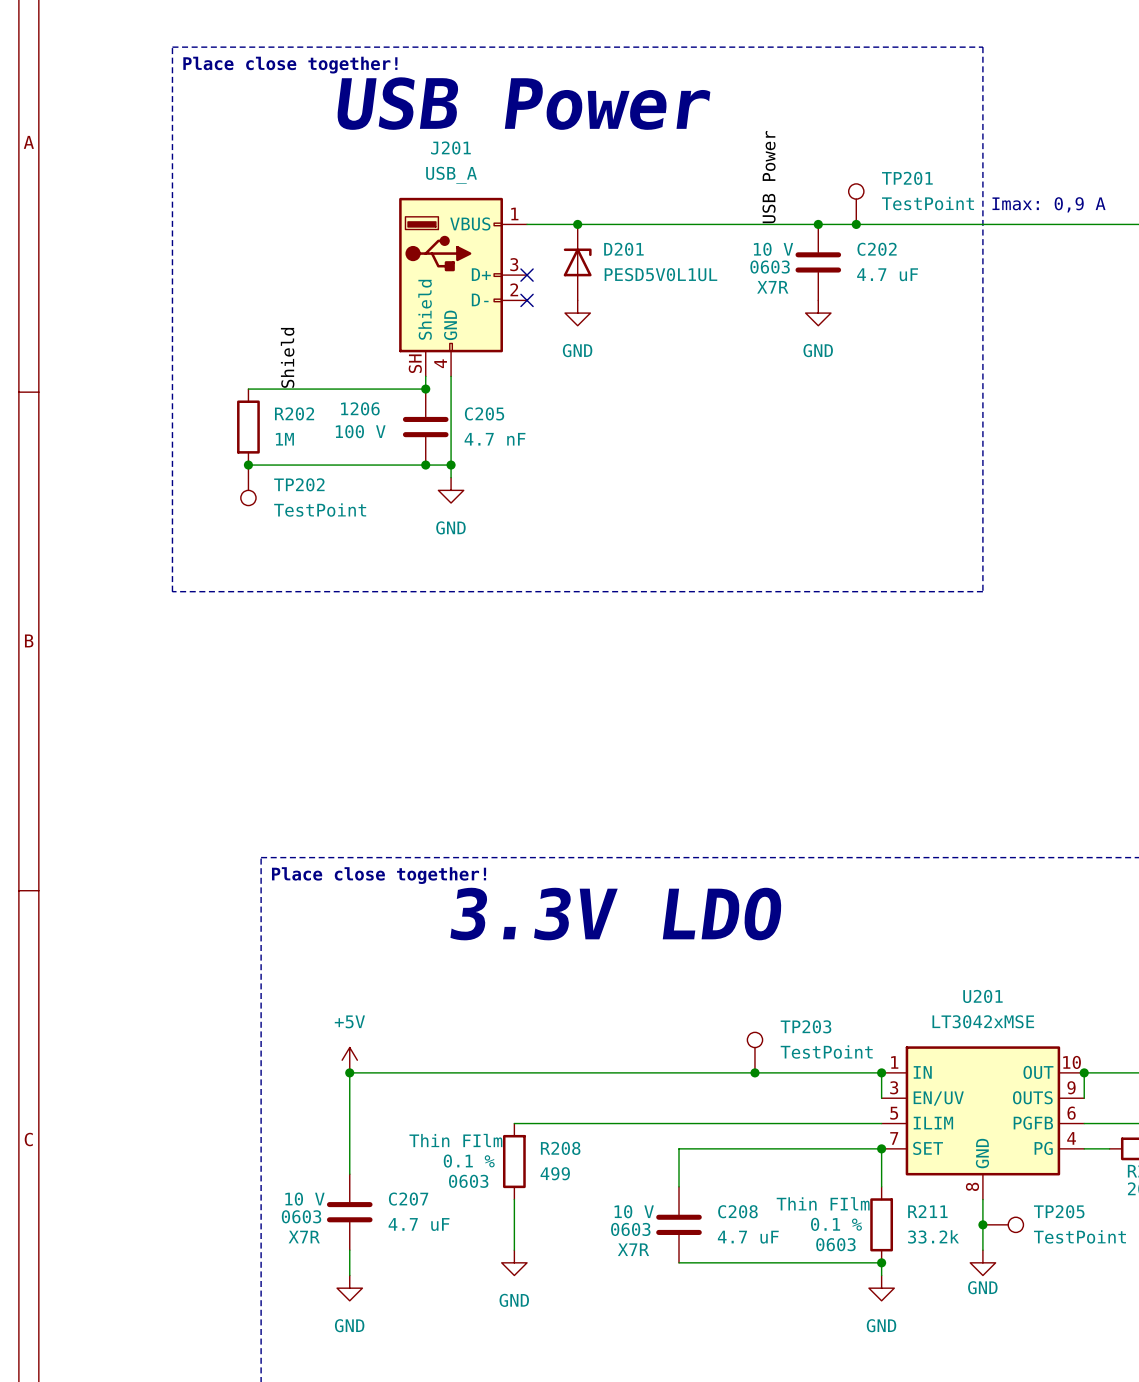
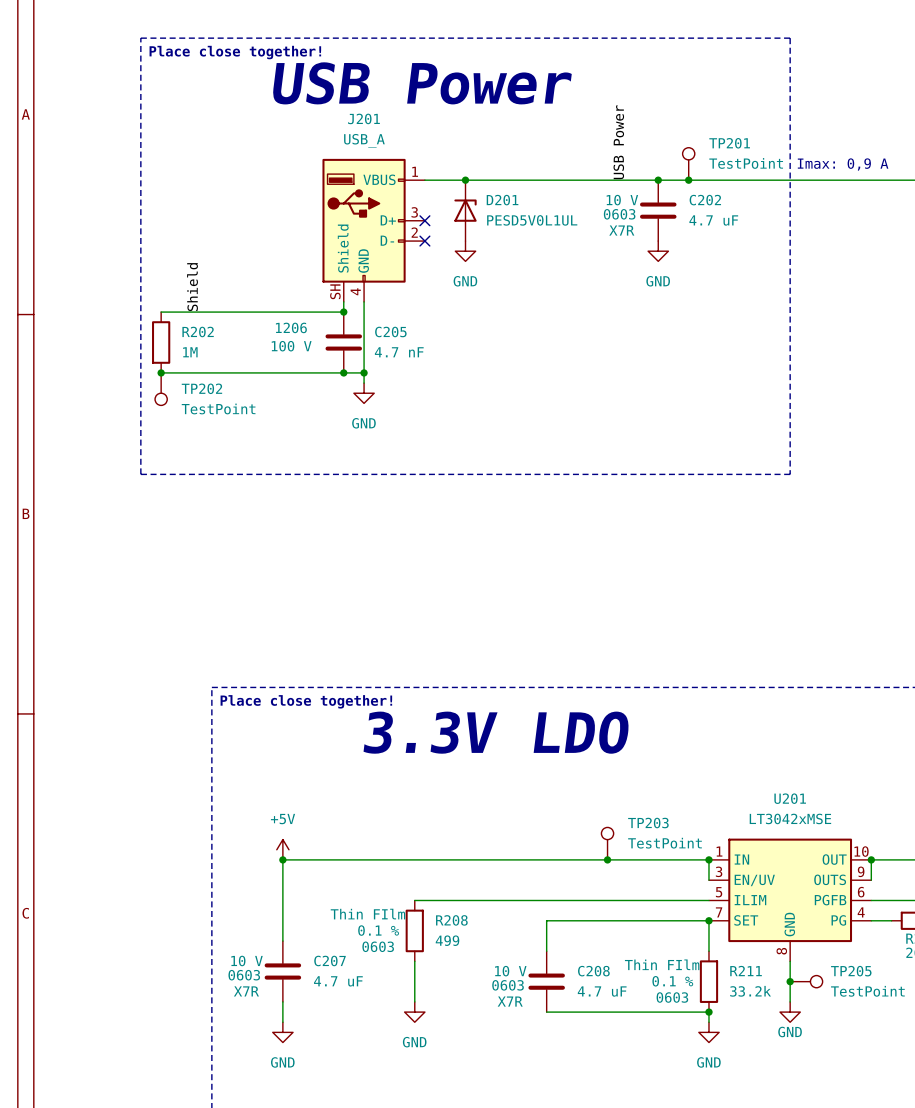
label position: Shield (287, 357) -> Shield (192, 287)
wire: none -> (161, 312) (201, 312)
R202 position: (248, 427) -> (161, 342)
wire: none -> (161, 372) (201, 372)
junction position: (248, 465) -> (161, 372)
TP202 position: (248, 485) -> (161, 389)

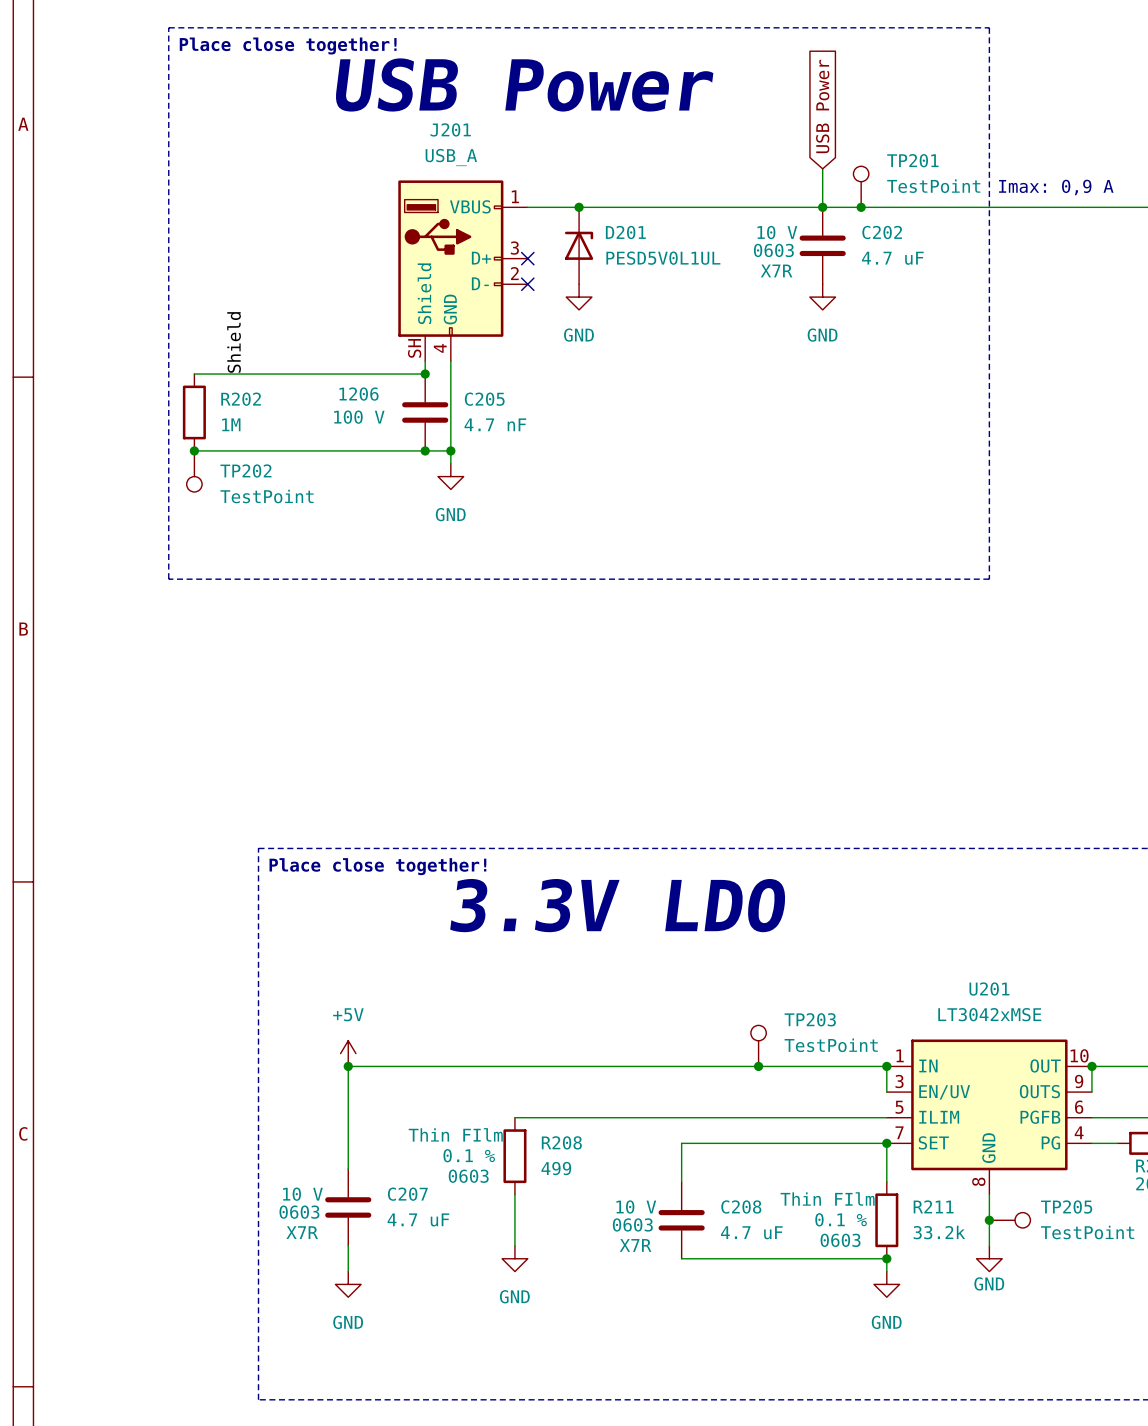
global label: none -> USB Power (822, 106)
label: USB Power (618, 142) -> none
wire: none -> (822, 168) (822, 207)

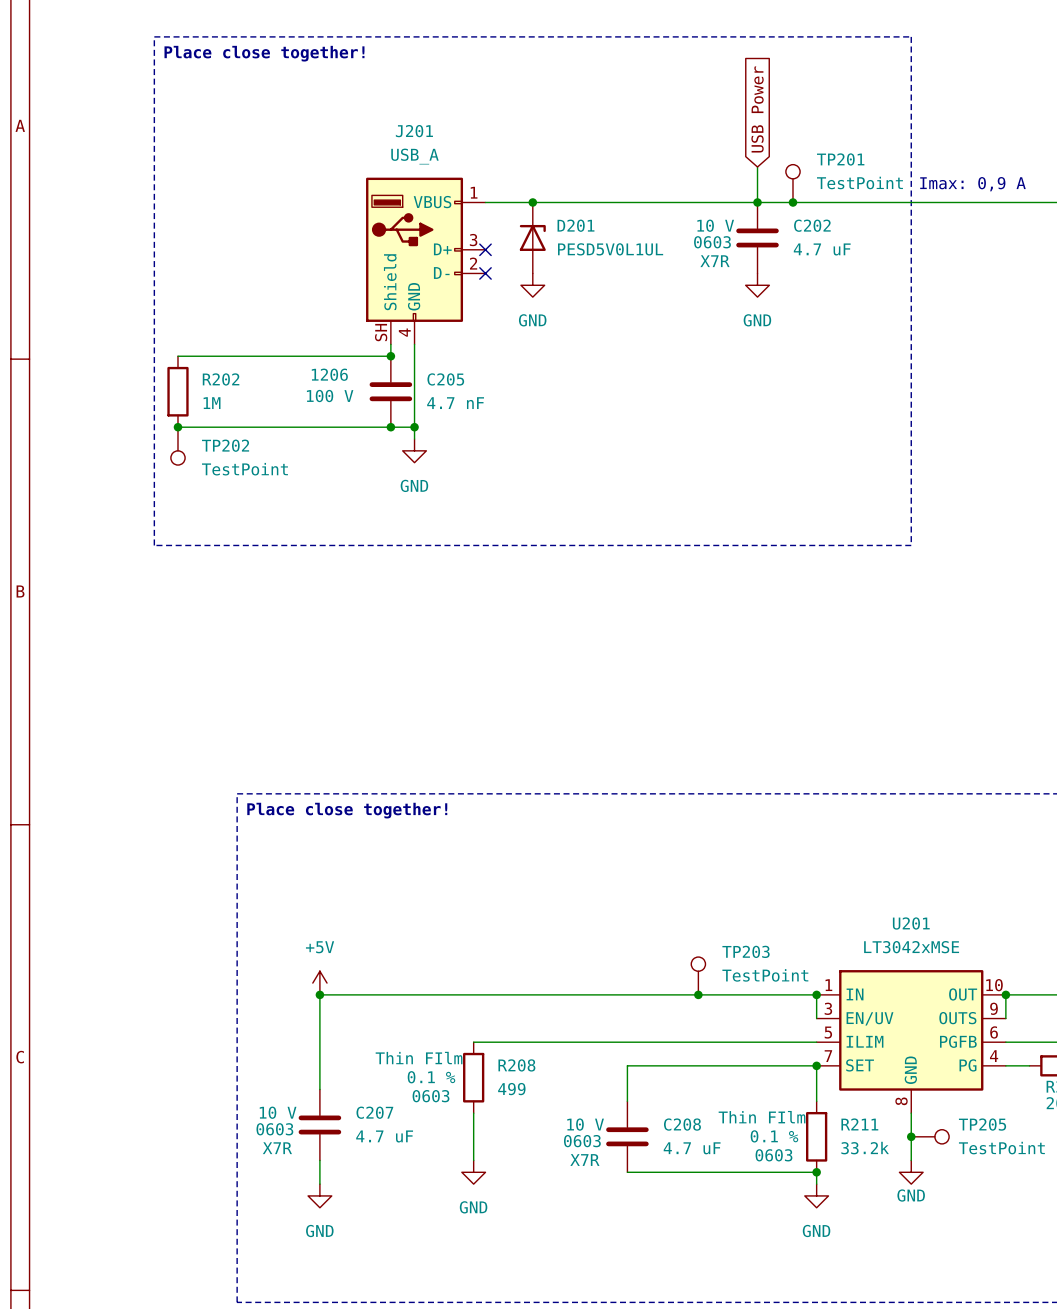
text: USB Power (524, 84) -> none
label: Shield (234, 342) -> none
text: 3.3V LDO (618, 905) -> none

